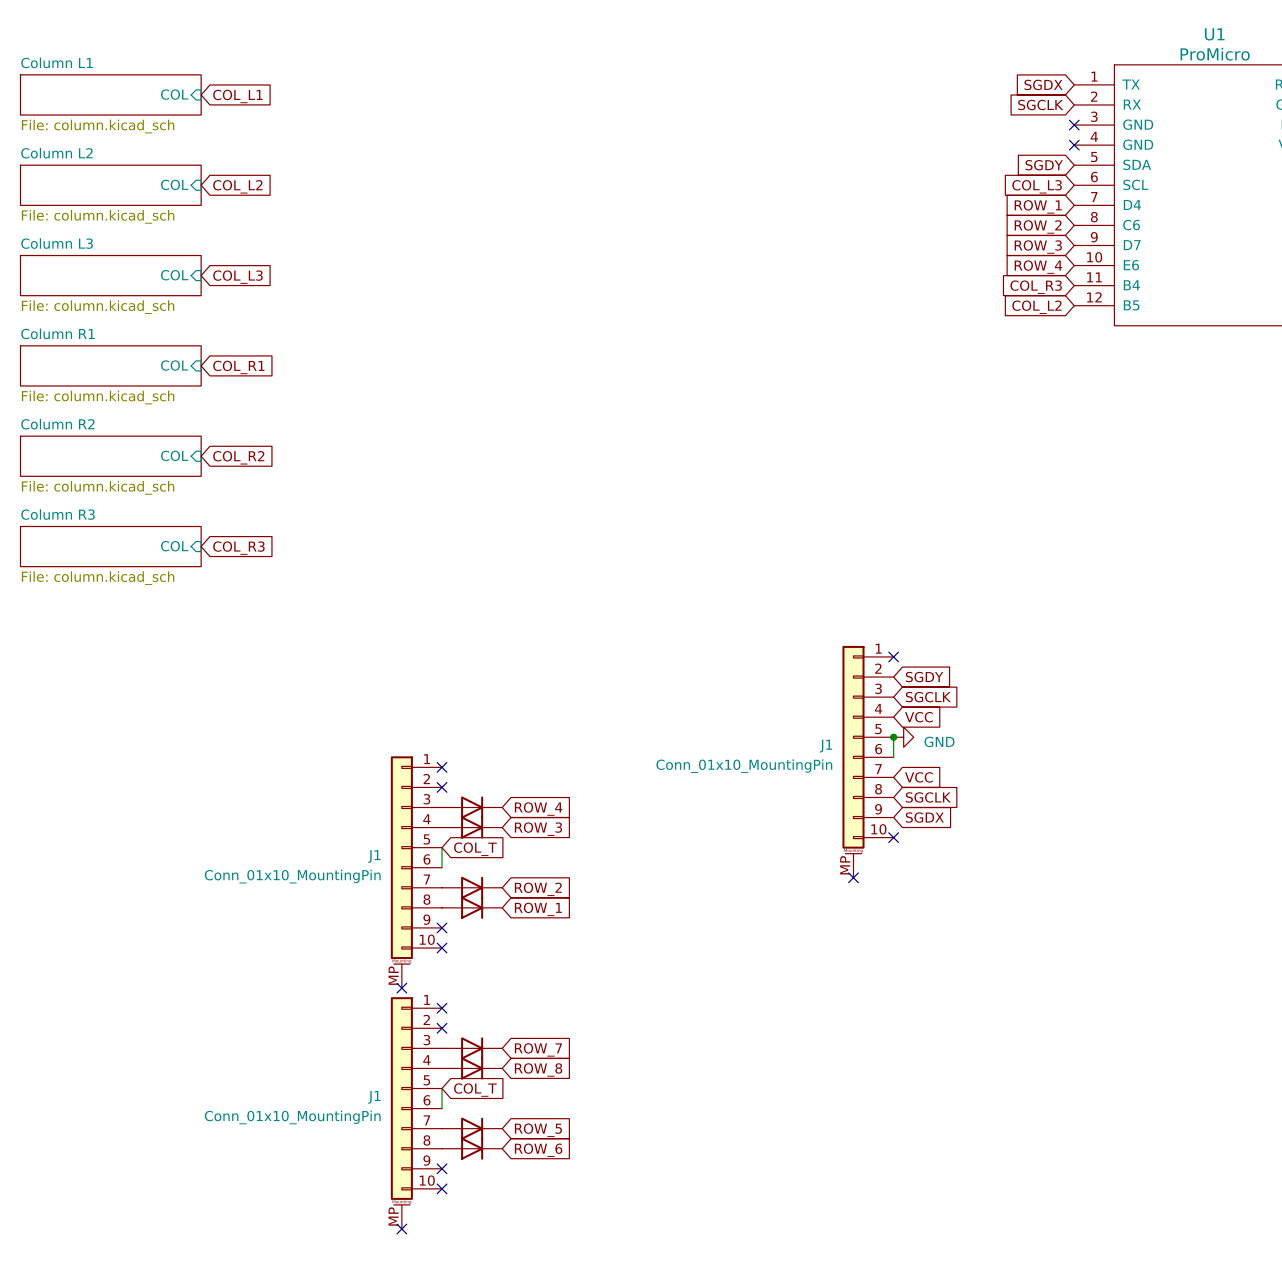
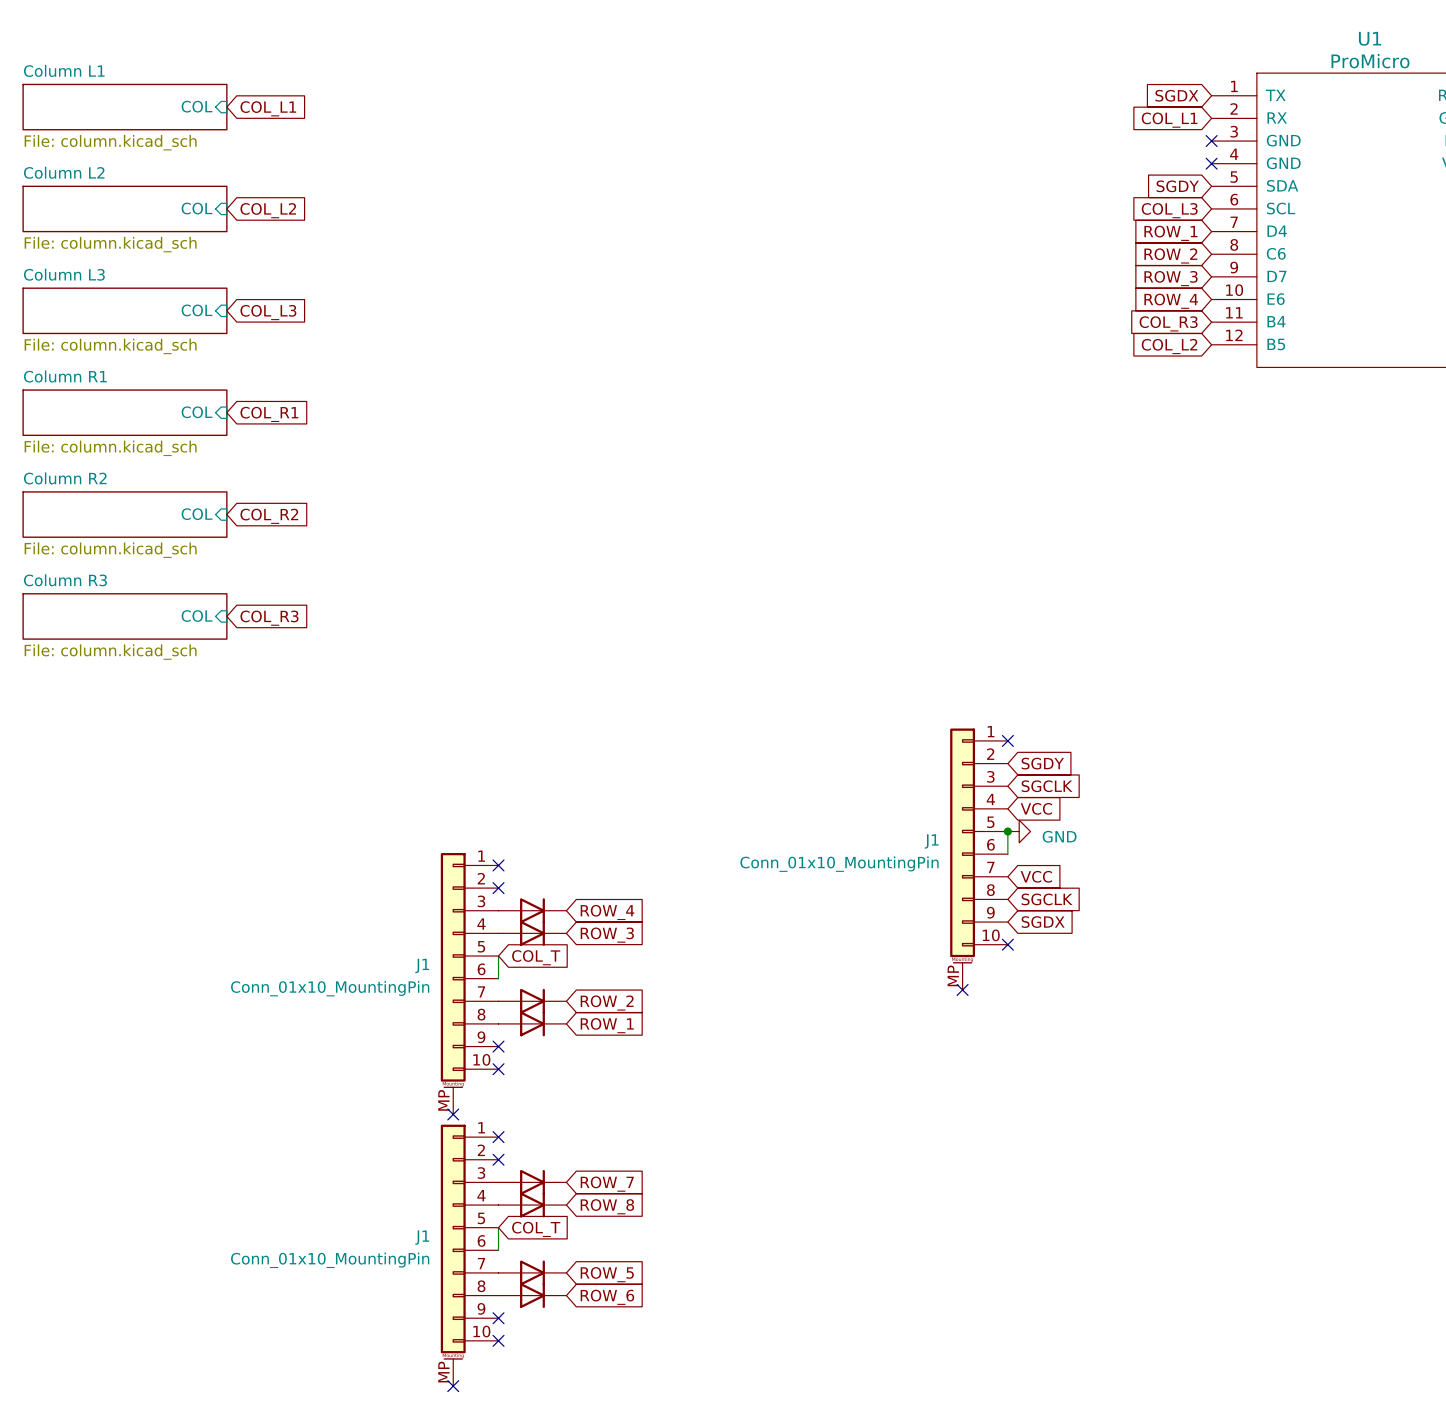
global label: SGCLK (1040, 104) -> COL_L1 (1169, 120)

